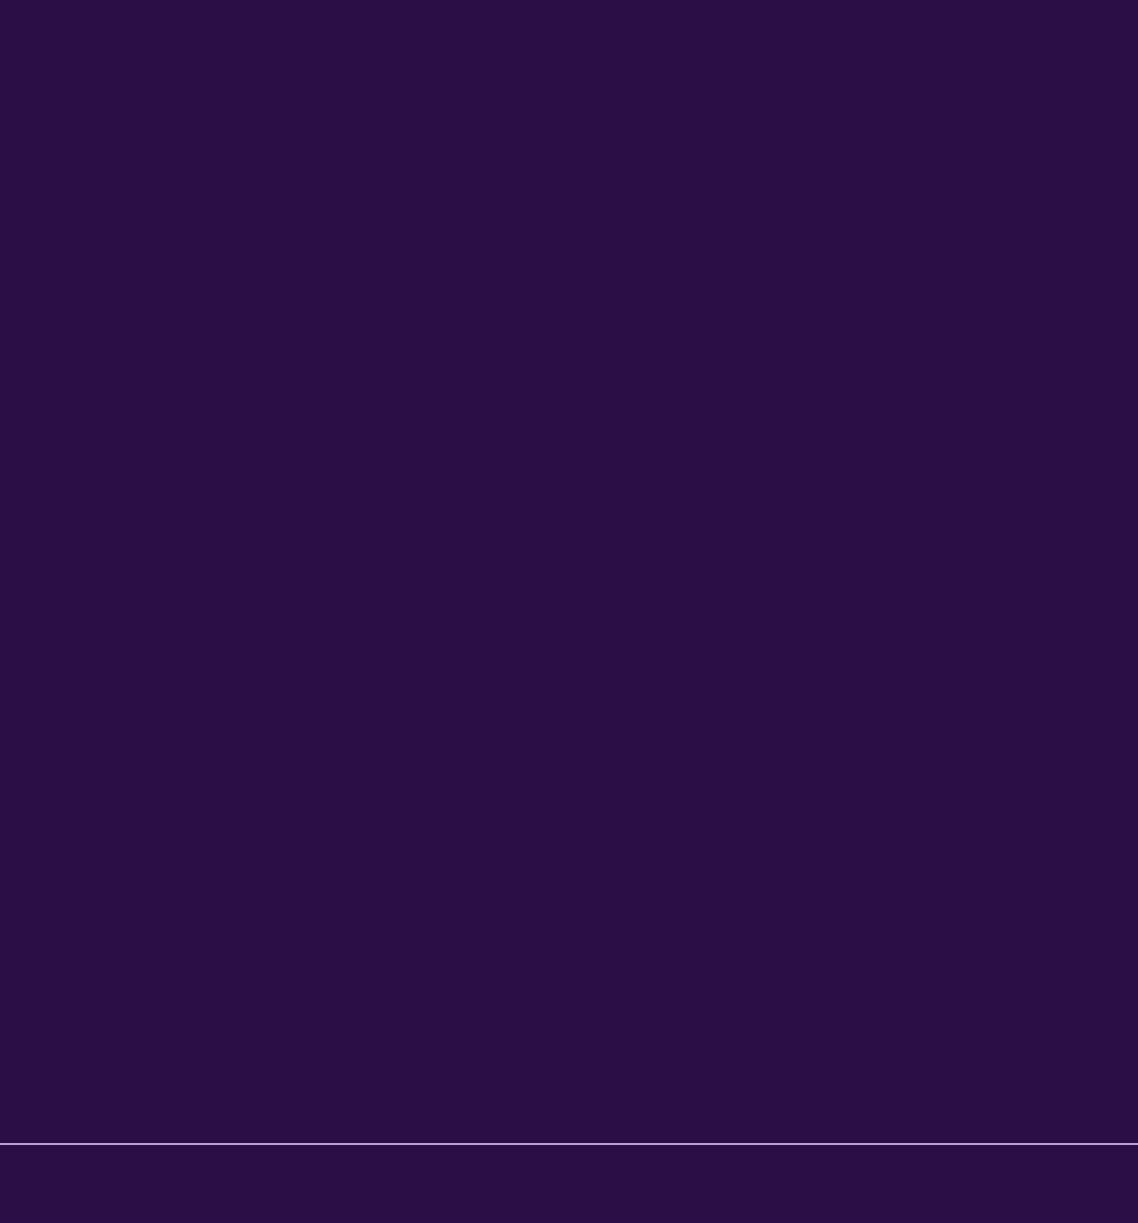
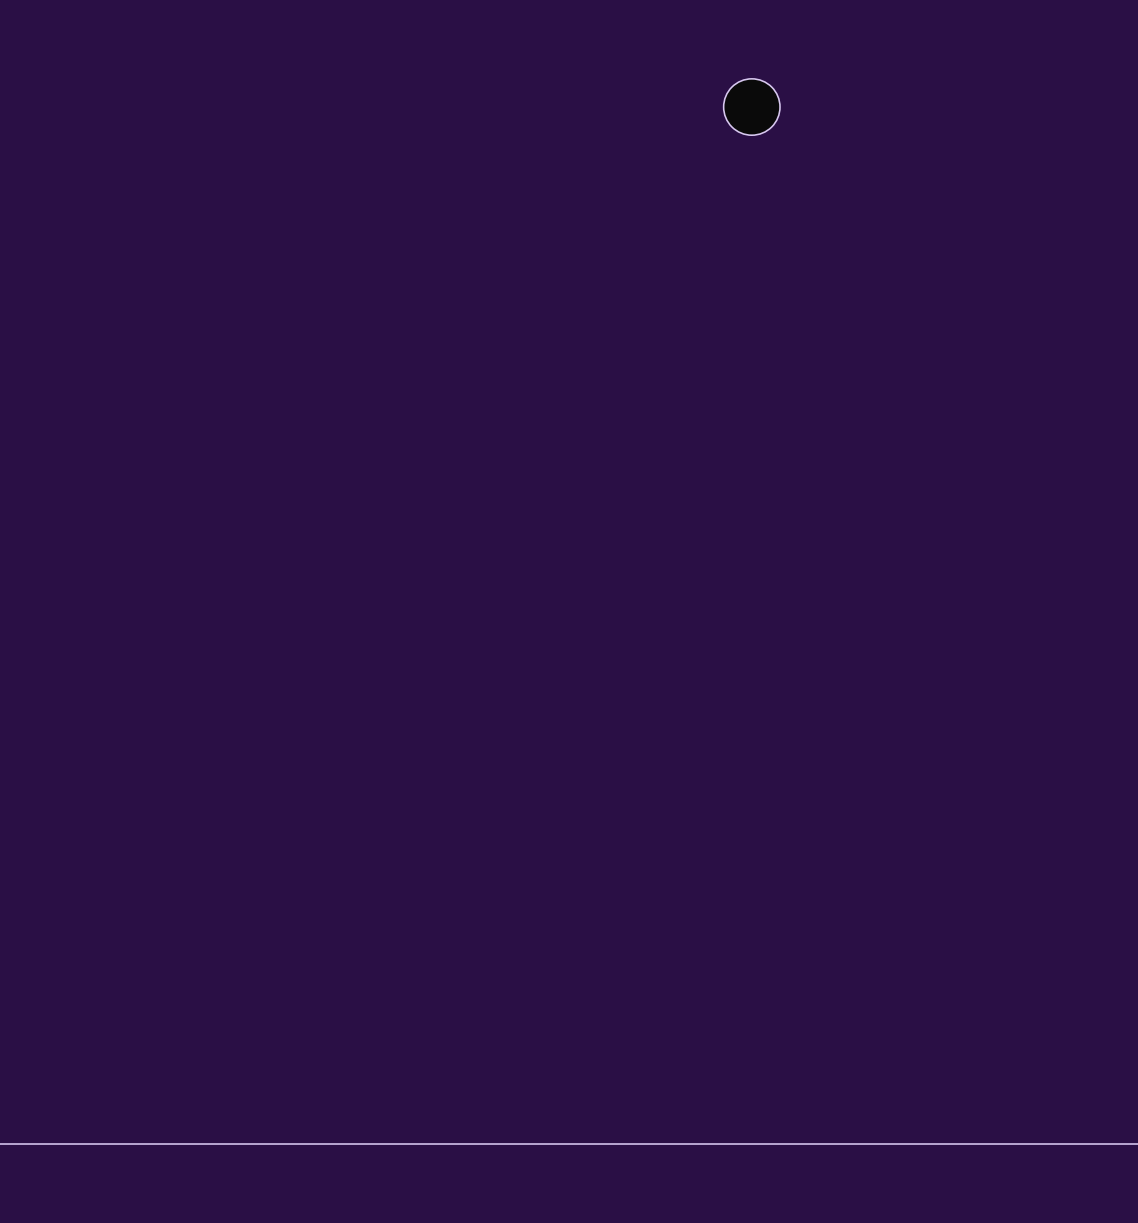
part: none -> (751, 107)

